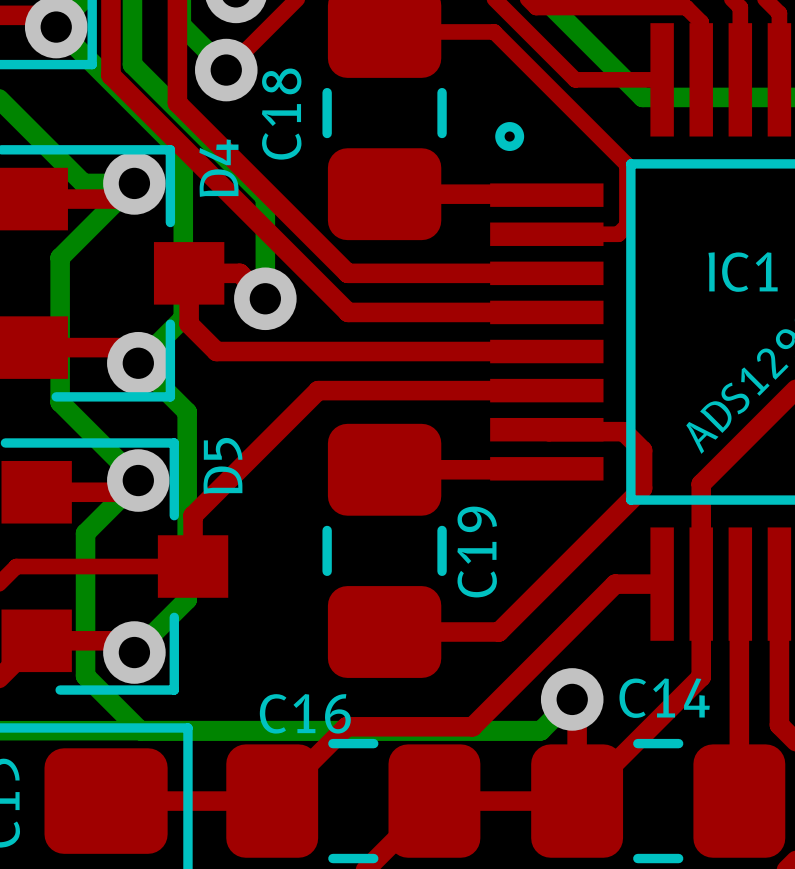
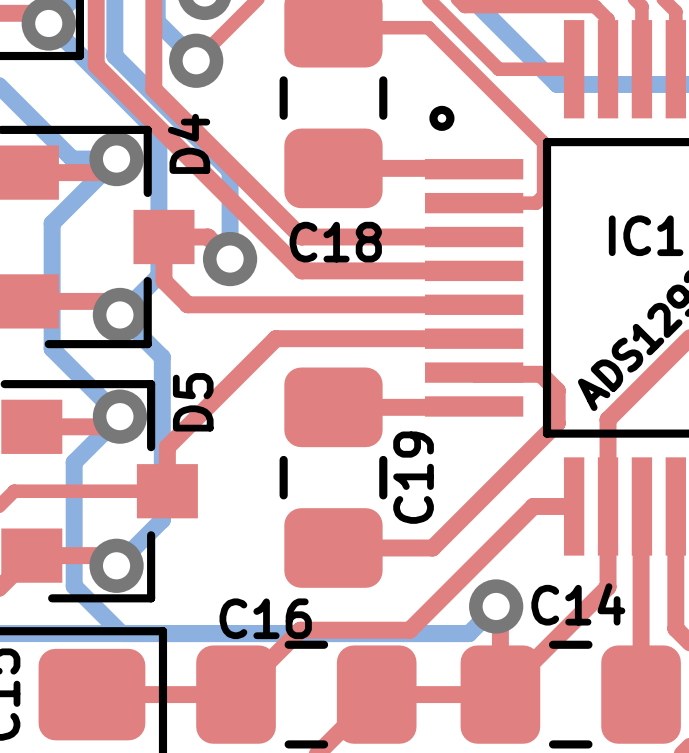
C18 name rotation: 0° (281, 114) -> 90° clockwise (335, 242)
C18 name position: C18 (281, 114) -> C18 (335, 242)

